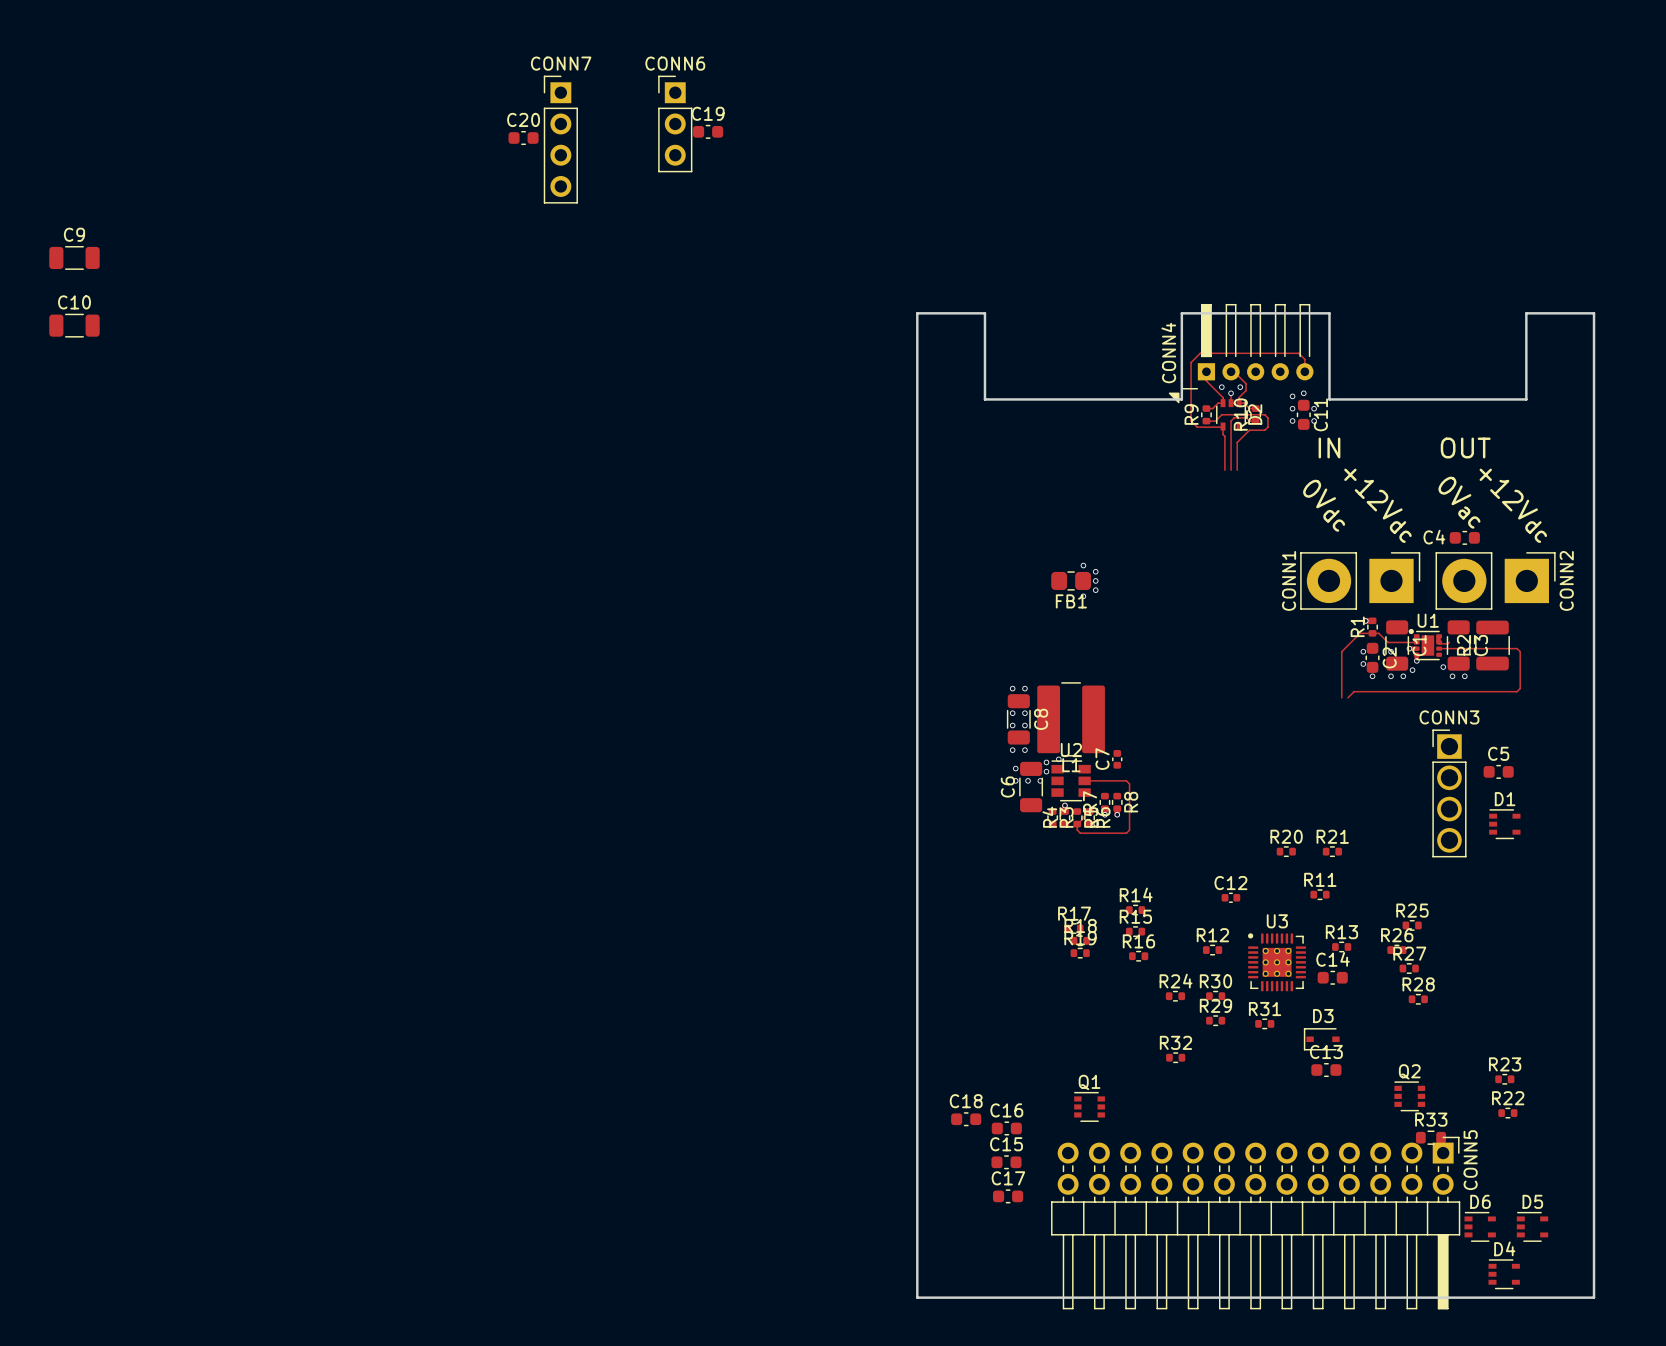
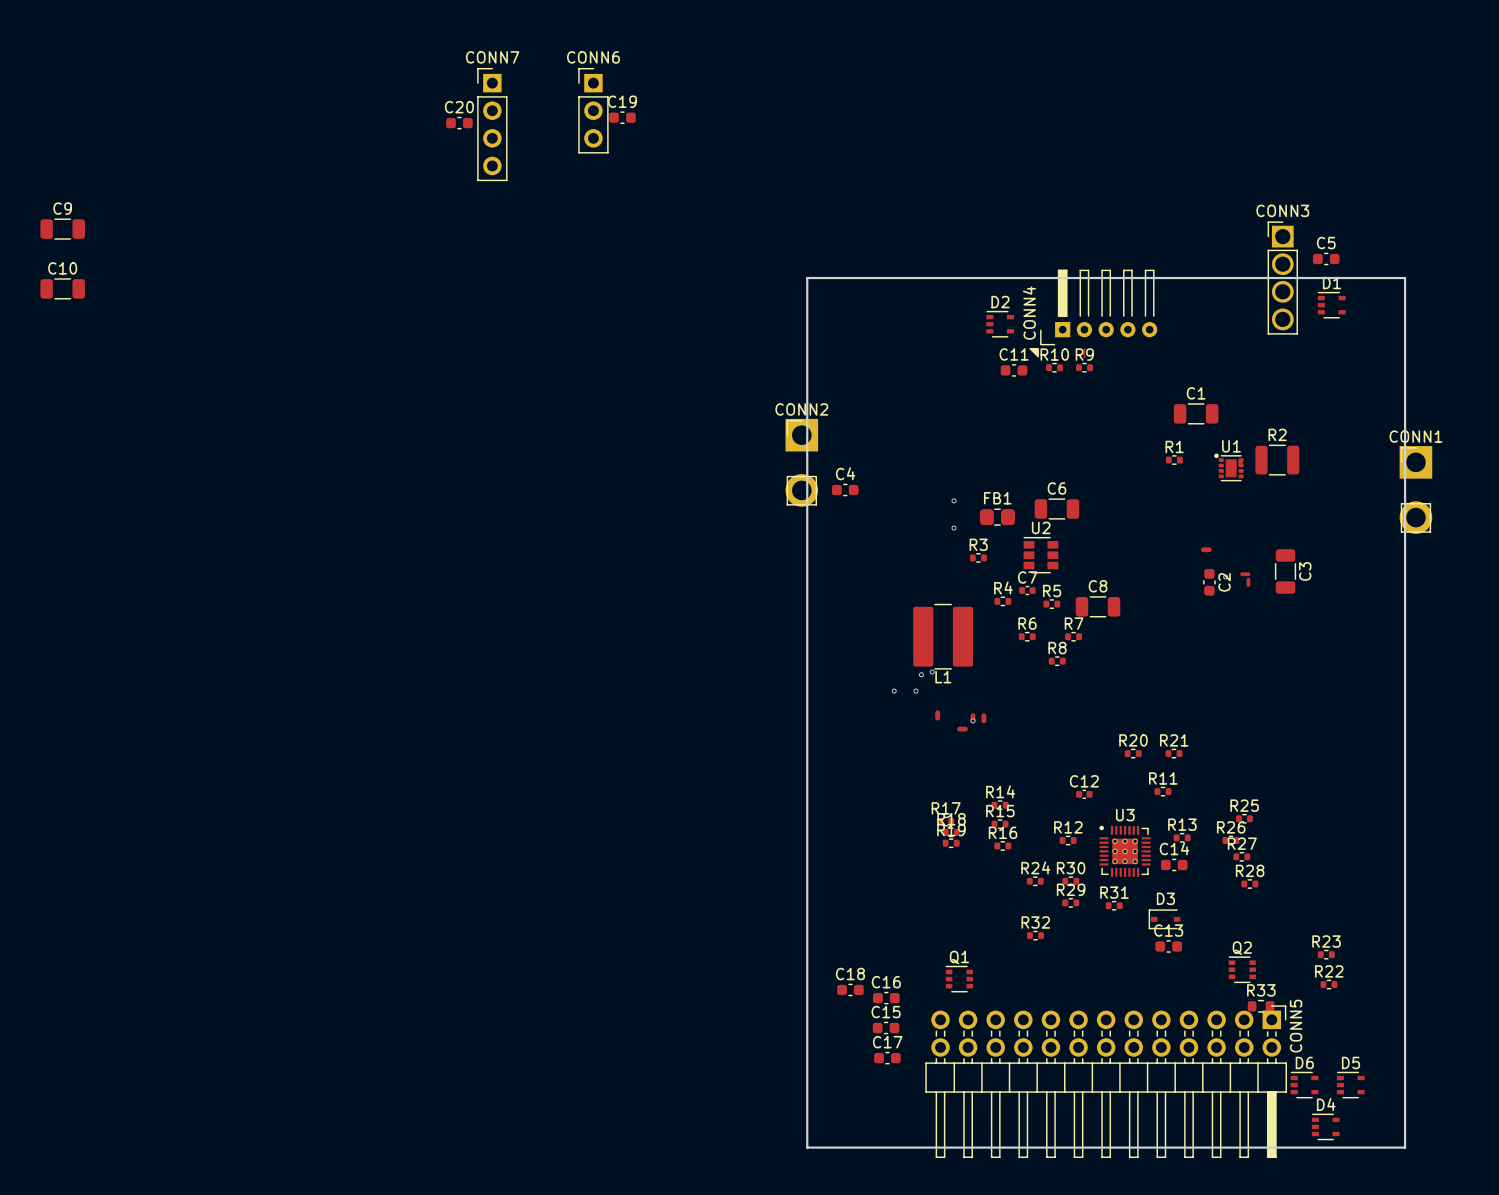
board edge: (984, 313) (984, 399) (1181, 399) (1181, 313) -> (867, 278) (1040, 278)
board edge: (1329, 313) (1329, 399) (1526, 399) (1526, 313) -> (1171, 278) (1345, 278)
track: (1206, 371) (1206, 381) (1223, 397) (1223, 403) (1218, 403) (1212, 408) (1206, 408) -> none
track: (1231, 371) (1234, 371) (1246, 383) (1246, 390) (1239, 397) (1239, 403) (1243, 403) (1249, 408) (1255, 408) -> none
track: (1304, 371) (1304, 359) (1298, 353) (1200, 353) (1191, 362) (1191, 420) (1197, 427) (1223, 426) (1224, 470) -> none
via: (1221, 387) -> none
via: (1240, 387) -> none
via: (1231, 393) -> none
via: (1303, 393) -> none
via: (1292, 396) -> none
via: (1292, 408) -> none
via: (1314, 408) -> none
R9 rotation: 0° (1206, 414) -> 90° clockwise (1084, 367)
R9 position: (1206, 414) -> (1084, 367)
D2 rotation: 0° (1231, 414) -> 90° counterclockwise (1000, 324)
D2 position: (1231, 414) -> (1000, 324)
R10 rotation: 0° (1255, 414) -> 90° clockwise (1054, 367)
R10 position: (1255, 414) -> (1054, 367)
C11 rotation: 0° (1303, 414) -> 90° clockwise (1014, 370)
C11 position: (1303, 414) -> (1014, 370)
C11 name position: C11 (1320, 414) -> C11 (1014, 354)
via: (1292, 420) -> none
via: (1314, 420) -> none
track: (1206, 421) (1215, 421) (1221, 414) (1264, 414) (1267, 417) (1267, 427) (1264, 430) (1249, 430) (1237, 442) (1237, 470) -> none
track: (1255, 421) (1249, 421) (1246, 417) (1234, 417) (1231, 420) (1231, 470) -> none
text: IN (1329, 447) -> none
text: OUT (1465, 447) -> none
text: 0Vac (1459, 502) -> none
text: 0Vdc (1324, 505) -> none
text: +12Vdc (1377, 505) -> none
text: +12Vdc (1513, 505) -> none
C4 name position: C4 (1434, 537) -> C4 (845, 473)
C4 position: (1464, 537) -> (845, 489)
CONN1 footprint: [1300, 552, 1421, 610] -> [1399, 446, 1433, 534]
CONN2 footprint: [1435, 552, 1556, 610] -> [785, 418, 819, 507]
via: (1095, 571) -> none
FB1 position: (1071, 580) -> (997, 517)
via: (1095, 580) -> none
CONN1 name position: CONN1 (1289, 580) -> CONN1 (1415, 436)
CONN2 name position: CONN2 (1566, 580) -> CONN2 (801, 409)
via: (1095, 590) -> none
FB1 name position: FB1 (1071, 601) -> FB1 (997, 498)
via: (1365, 620) -> none
R1 rotation: 0° (1372, 627) -> 90° clockwise (1174, 460)
R1 position: (1372, 627) -> (1174, 460)
U1 footprint: [1408, 628, 1443, 661] -> [1214, 453, 1244, 482]
track: (1416, 642) (1387, 642) (1378, 633) (1360, 633) (1341, 651) (1341, 697) -> none
track: (1439, 642) (1439, 643) (1449, 642) -> none
C1 rotation: 0° (1397, 645) -> 90° clockwise (1196, 413)
C1 position: (1397, 645) -> (1196, 413)
C1 name position: C1 (1419, 645) -> C1 (1196, 393)
R2 rotation: 0° (1492, 645) -> 90° clockwise (1277, 460)
R2 position: (1492, 645) -> (1277, 460)
via: (1409, 648) -> none
track: (1439, 648) (1517, 648) (1520, 651) (1520, 688) (1517, 691) (1354, 691) (1347, 697) -> none
via: (1363, 651) -> none
via: (1416, 660) -> none
via: (1363, 663) -> none
via: (1443, 667) -> none
via: (1412, 670) -> none
via: (1372, 676) -> none
via: (1391, 676) -> none
via: (1403, 676) -> none
via: (1452, 676) -> none
via: (1464, 676) -> none
via: (1012, 688) -> none
via: (1024, 688) -> none
via: (1012, 713) -> none
via: (1024, 713) -> none
C8 rotation: 0° (1018, 719) -> 90° clockwise (1098, 606)
C8 position: (1018, 719) -> (1098, 606)
C8 name position: C8 (1041, 719) -> C8 (1098, 586)
via: (1012, 725) -> none
via: (1024, 725) -> none
via: (1012, 750) -> none
via: (1024, 750) -> none
C7 rotation: 0° (1117, 759) -> 90° clockwise (1027, 590)
C7 position: (1117, 759) -> (1027, 590)
via: (1015, 768) -> none
via: (1046, 771) -> none
C5 position: (1498, 771) -> (1326, 258)
via: (1028, 780) -> none
U2 position: (1071, 780) -> (1040, 555)
track: (1084, 780) (1126, 780) (1129, 783) (1129, 830) (1126, 833) (1080, 833) (1077, 830) (1077, 824) (1089, 811) -> none
C6 rotation: 0° (1031, 787) -> 90° clockwise (1056, 508)
C6 position: (1031, 787) -> (1056, 508)
CONN3 position: (1449, 793) -> (1282, 278)
R7 rotation: 0° (1104, 802) -> 90° clockwise (1073, 636)
R7 position: (1104, 802) -> (1073, 636)
R8 rotation: 0° (1117, 802) -> 90° clockwise (1057, 661)
R8 position: (1117, 802) -> (1057, 661)
via: (1064, 805) -> none
via: (1117, 814) -> none
R3 rotation: 0° (1052, 817) -> 90° clockwise (978, 557)
R3 position: (1052, 817) -> (978, 557)
R4 rotation: 0° (1064, 817) -> 90° clockwise (1002, 601)
R4 position: (1064, 817) -> (1002, 601)
R5 rotation: 0° (1077, 817) -> 90° clockwise (1051, 604)
R5 position: (1077, 817) -> (1051, 604)
R6 rotation: 0° (1089, 817) -> 90° clockwise (1027, 636)
R6 position: (1089, 817) -> (1027, 636)
via: (1096, 823) -> none
D1 position: (1504, 824) -> (1331, 305)

